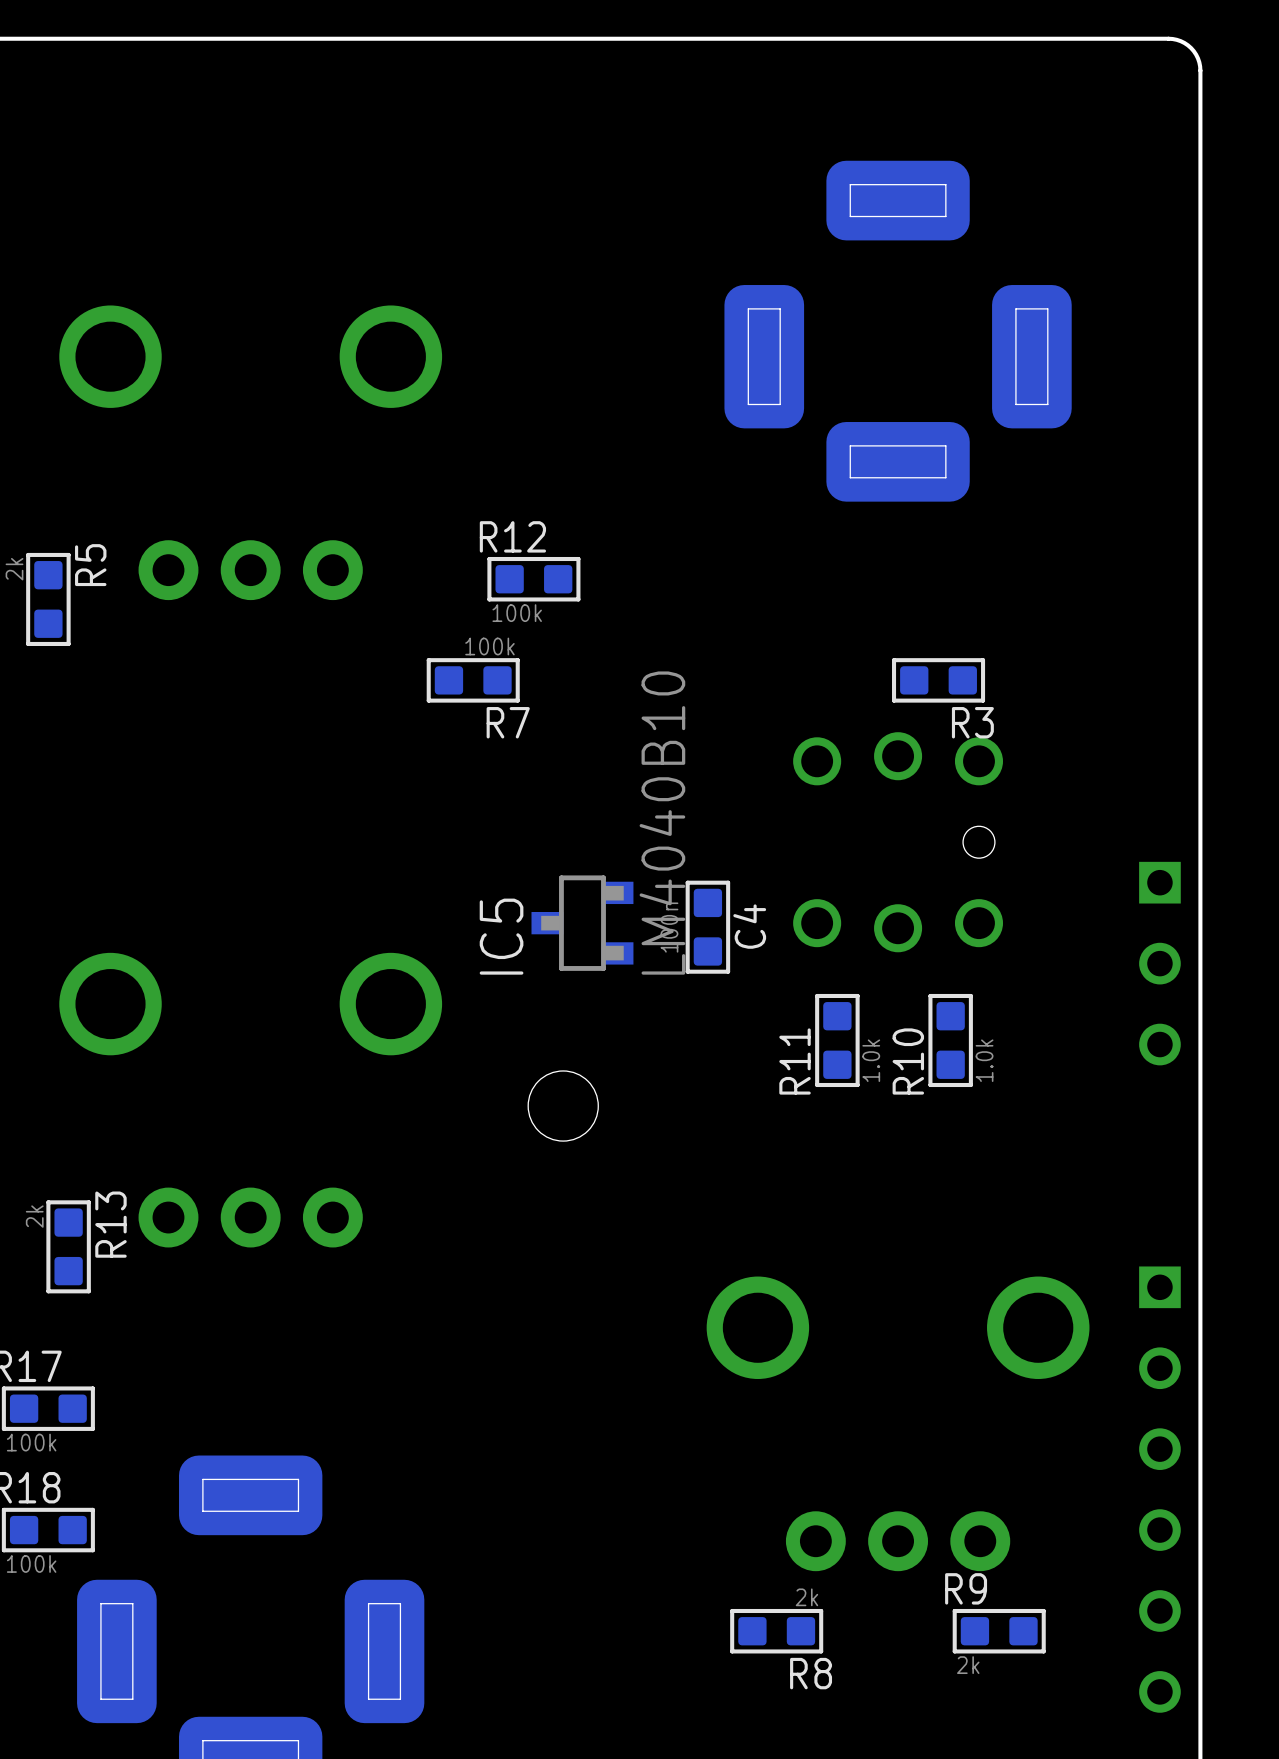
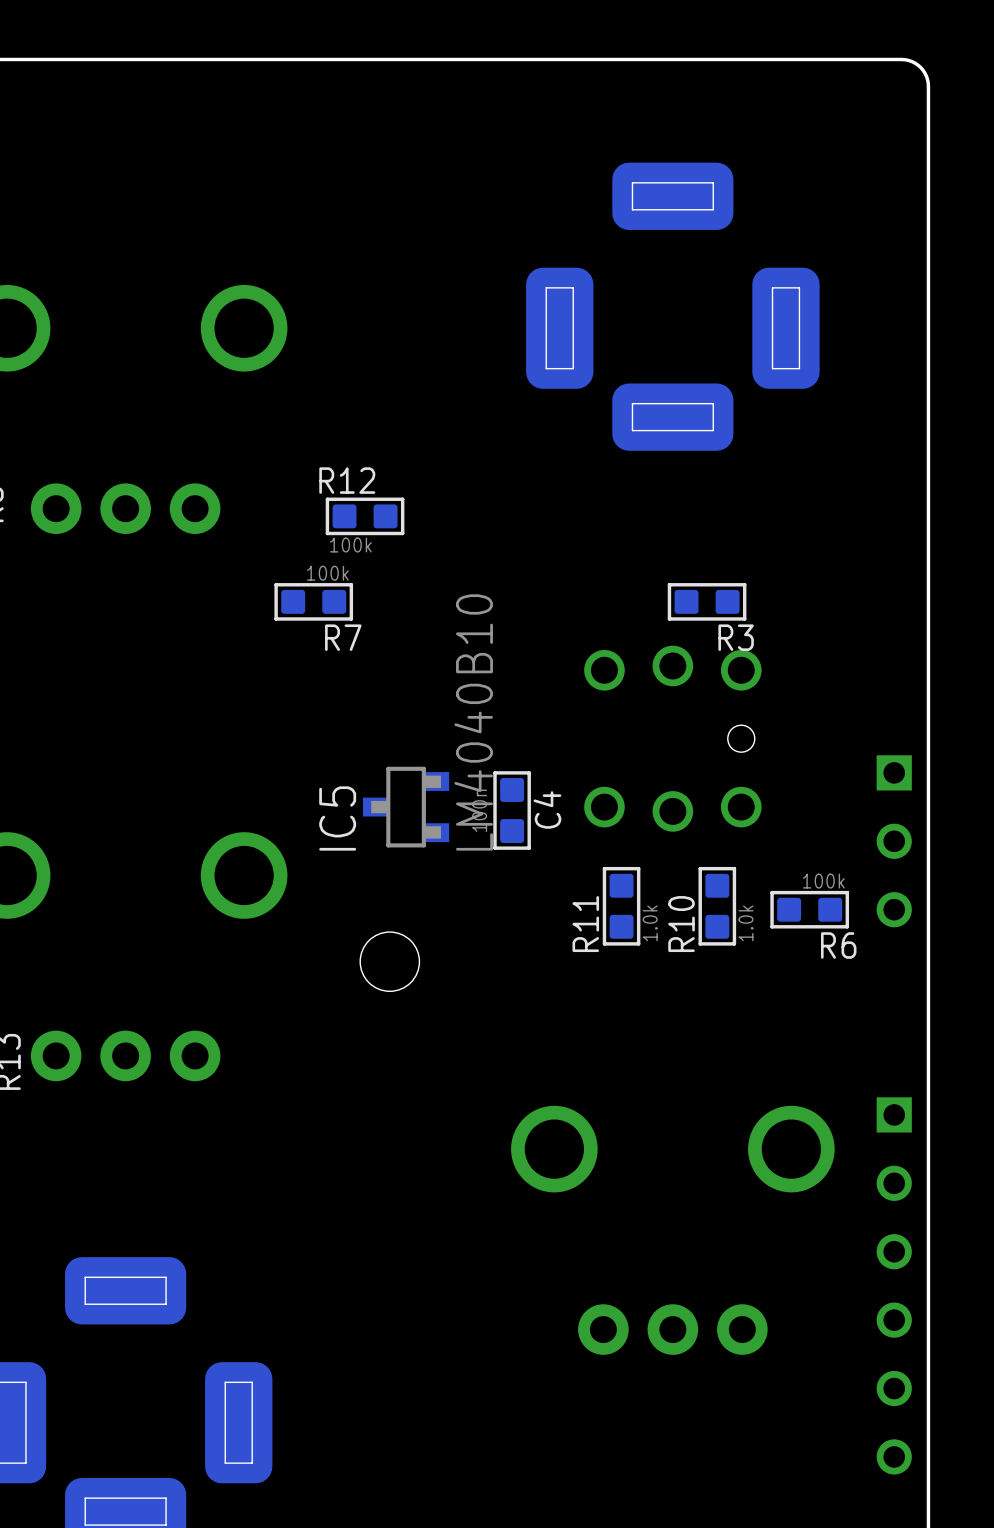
R6: none -> 100k (809, 909)
R8: 2k (776, 1631) -> none
R9: 2k (999, 1631) -> none

